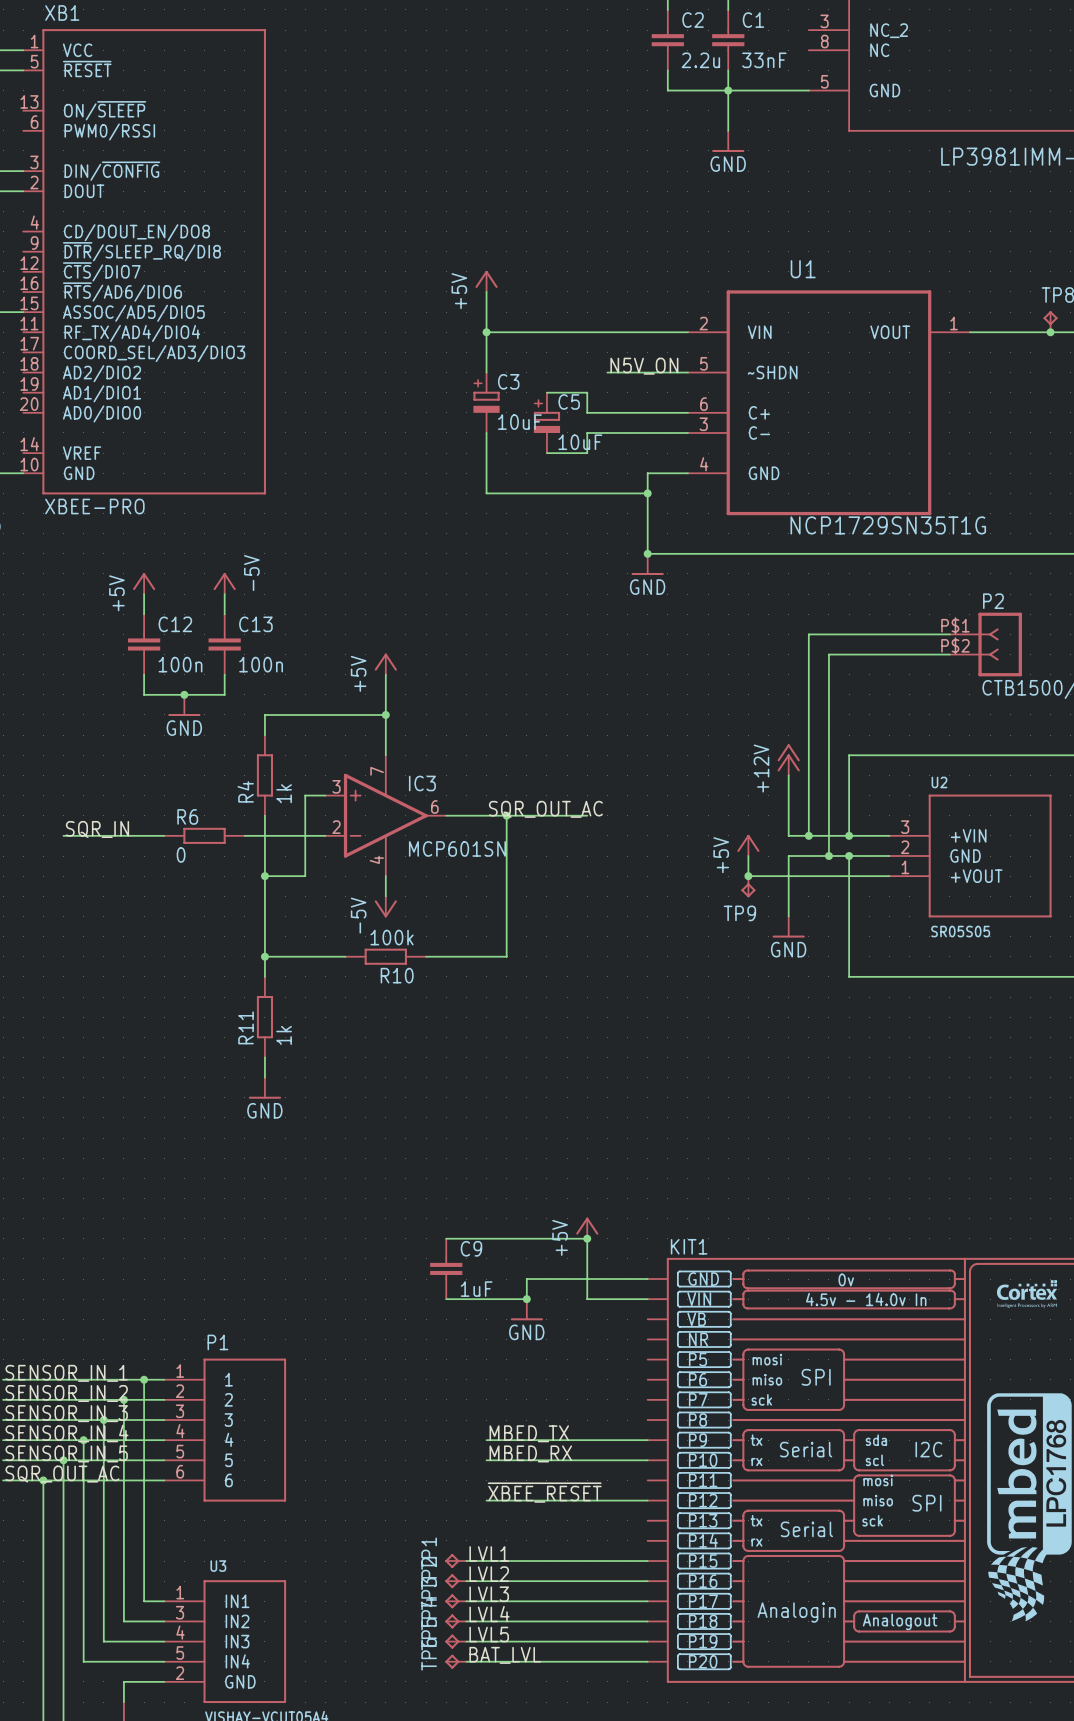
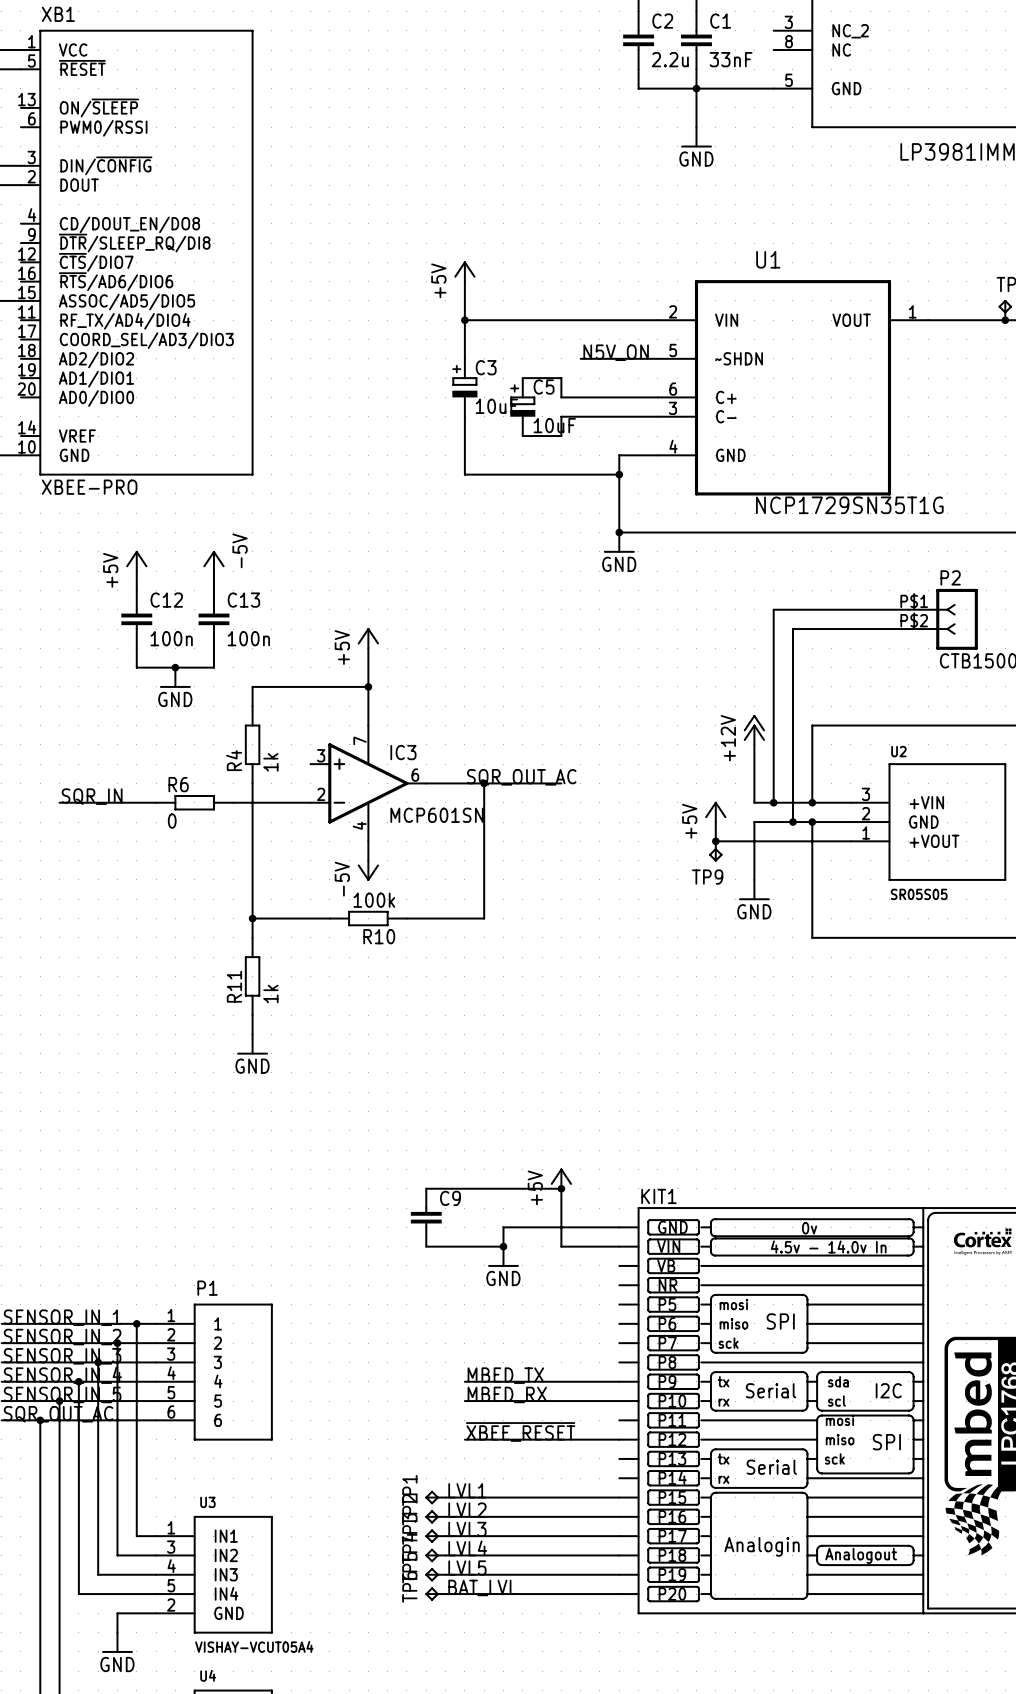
wire: (325, 795) (305, 795) (305, 876) (264, 876) -> none
junction: (264, 876) -> none
C9 value: 1uF (476, 1289) -> none

